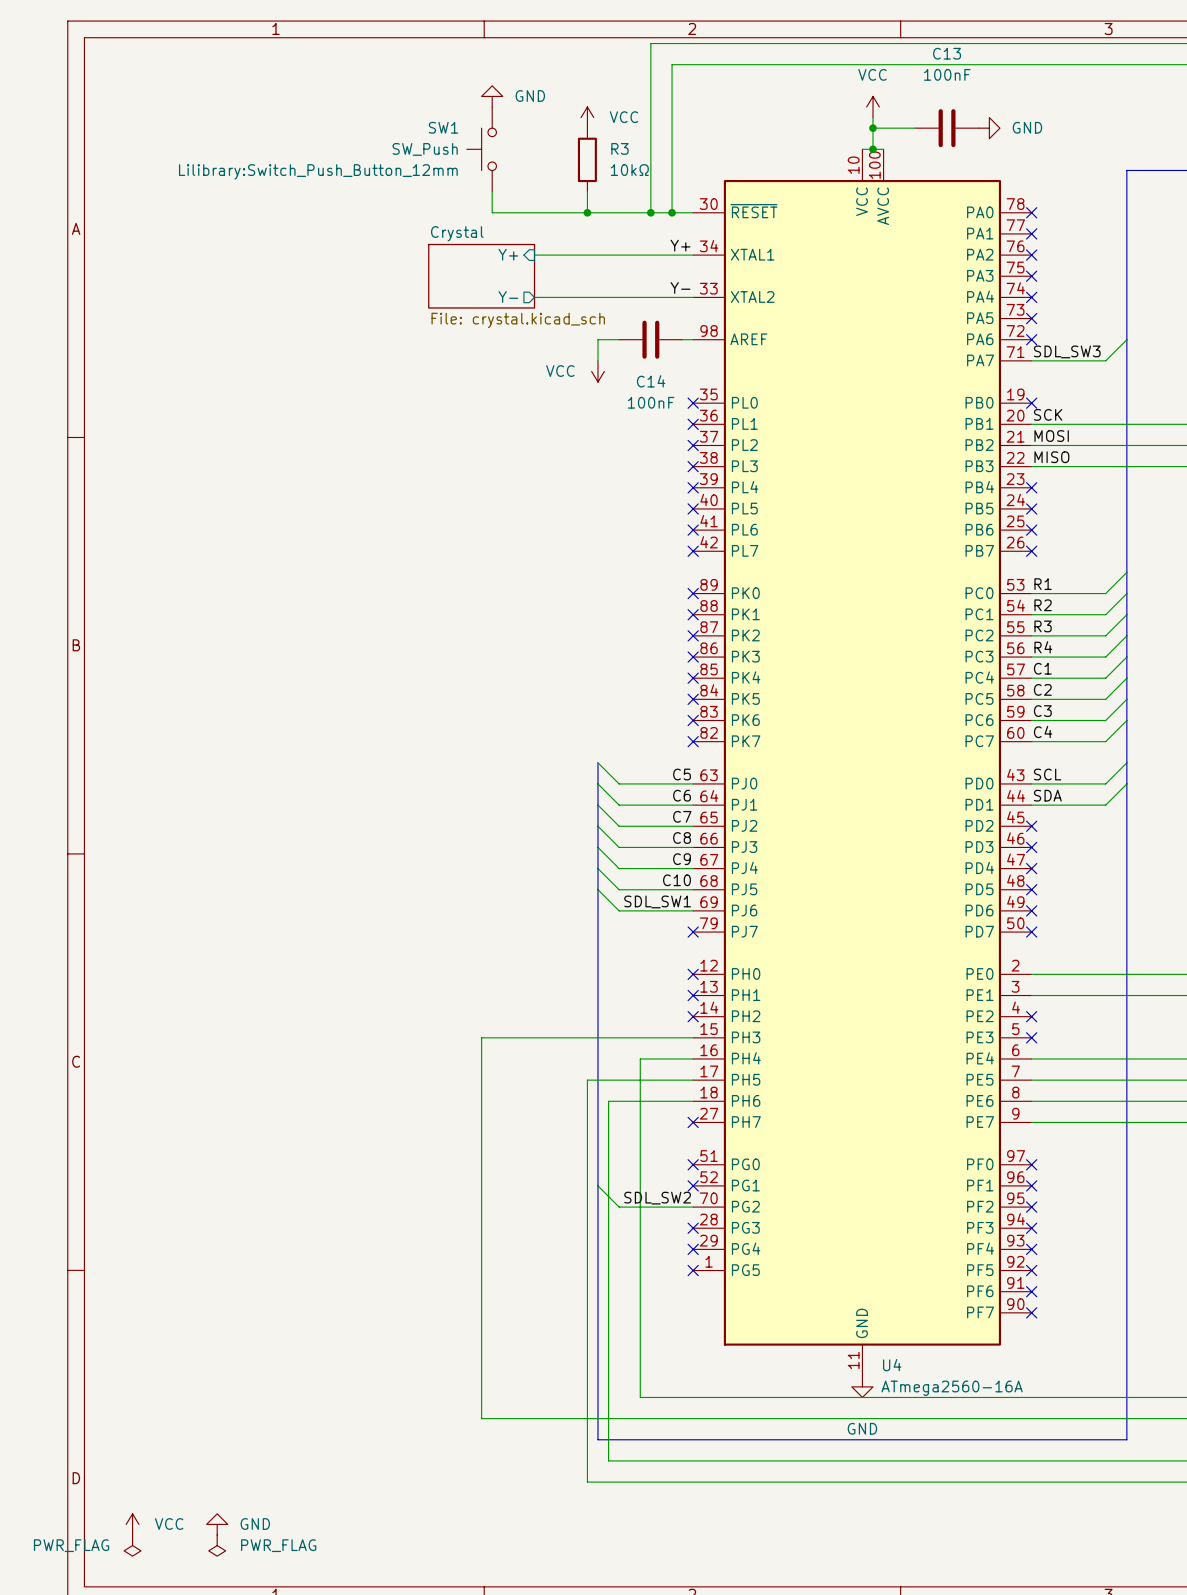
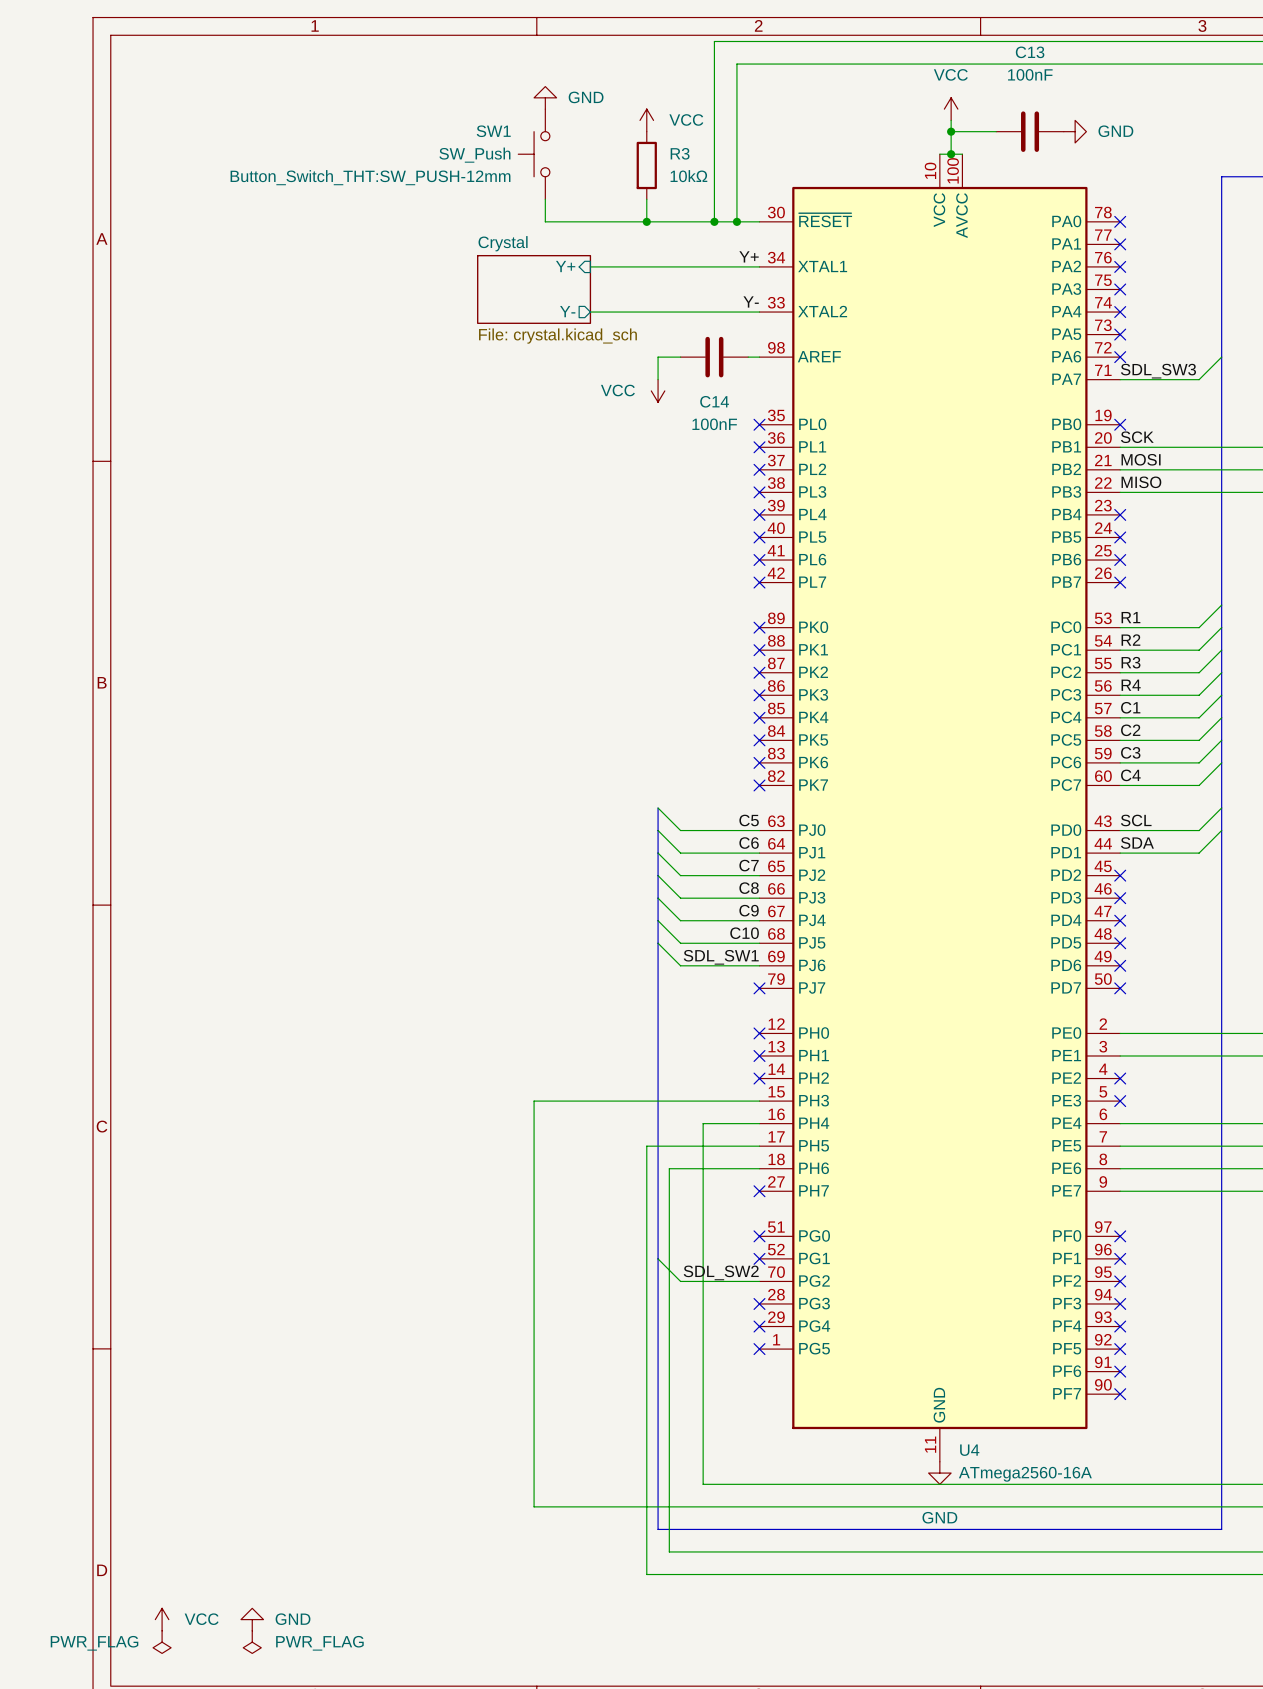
SW1 text: Lilibrary:Switch_Push_Button_12mm (318, 171) -> Button_Switch_THT:SW_PUSH-12mm (370, 177)

